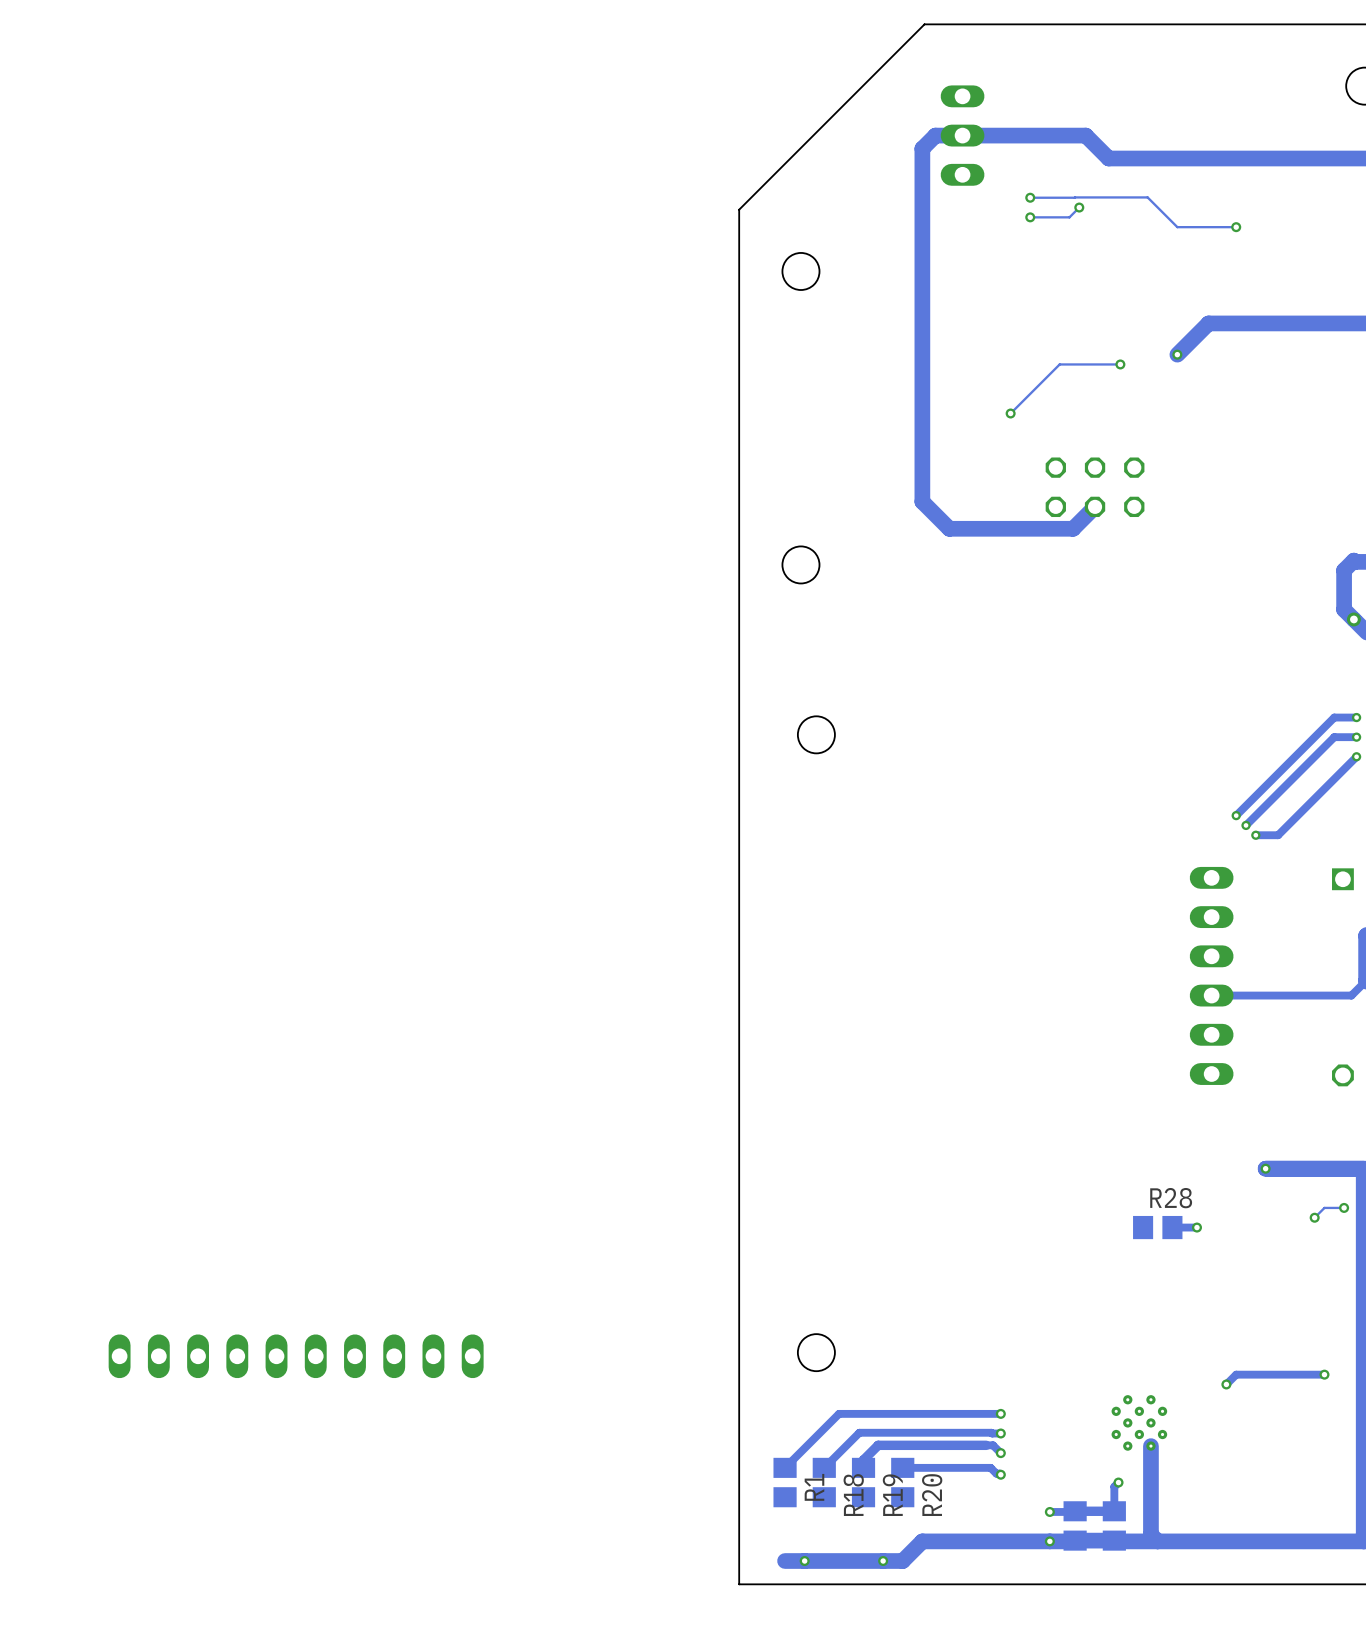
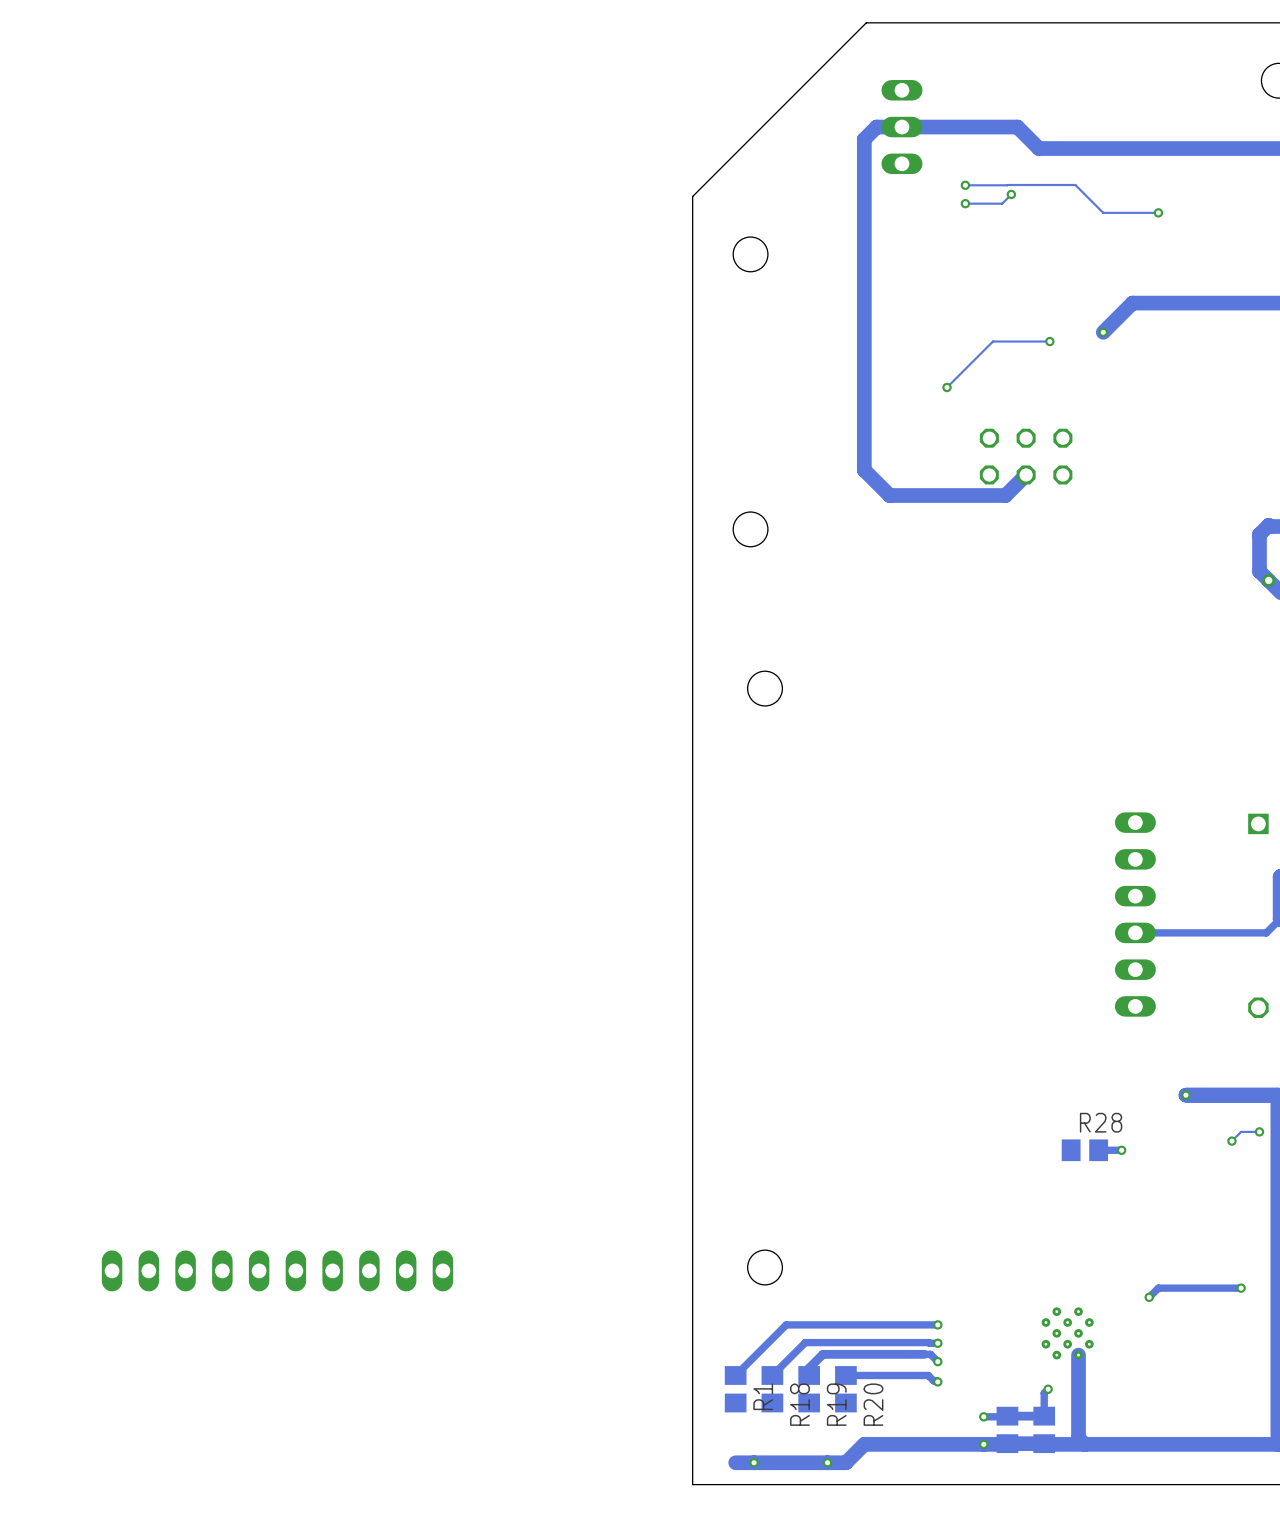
track: (1356, 717) (1334, 717) (1236, 815) -> none
via: (1356, 717) -> none
track: (1356, 737) (1334, 737) (1246, 825) -> none
via: (1356, 737) -> none
track: (1356, 756) (1278, 835) (1255, 835) -> none
via: (1356, 756) -> none
via: (1236, 815) -> none
via: (1246, 825) -> none
via: (1255, 835) -> none

